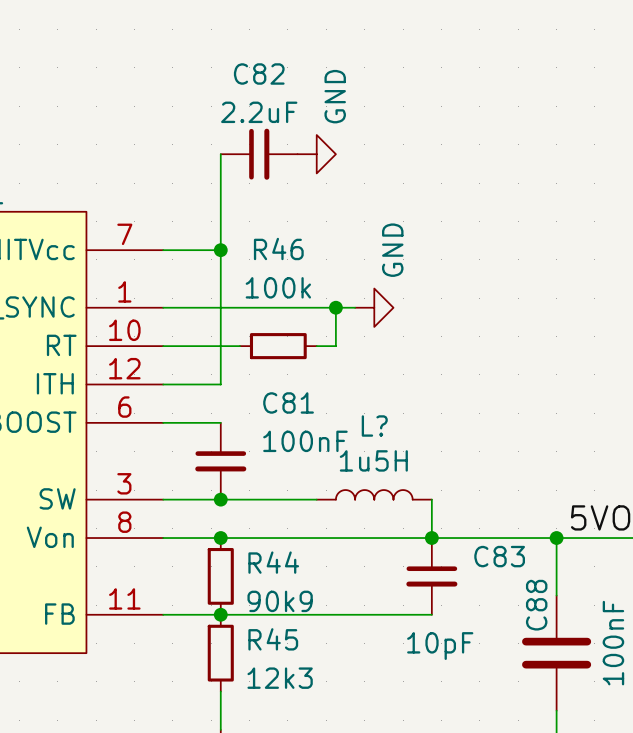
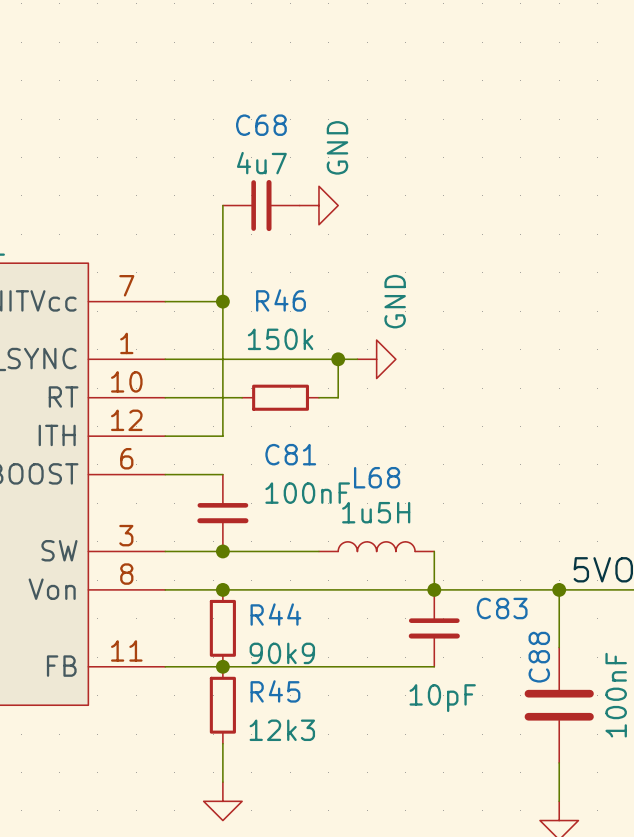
C82 name: C82 (259, 73) -> C68 (261, 125)
C82 value: 2.2uF (259, 112) -> 4u7 (261, 163)
R46 value: 100k (278, 287) -> 150k (280, 339)
L? name: L? (374, 425) -> L68 (377, 477)

